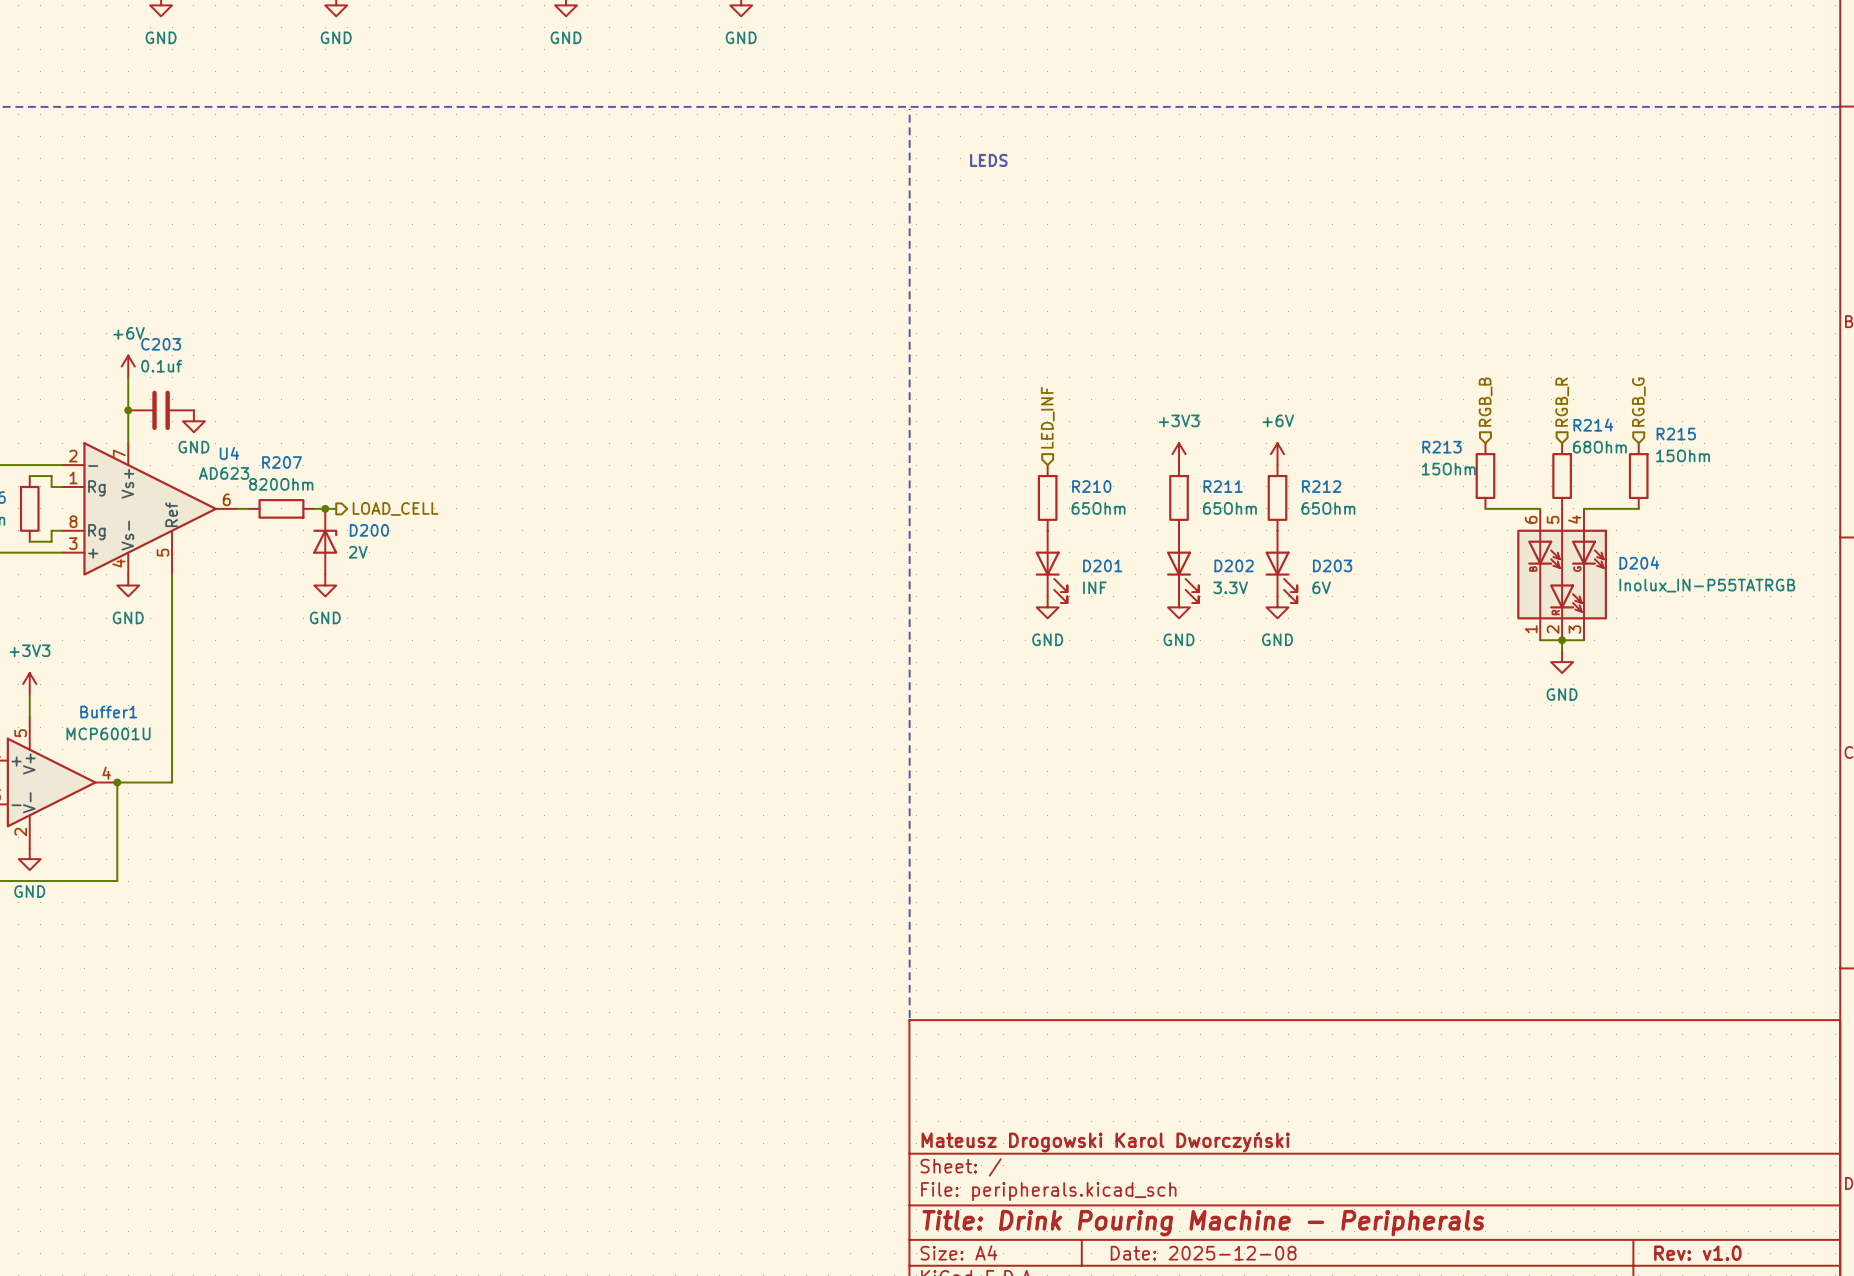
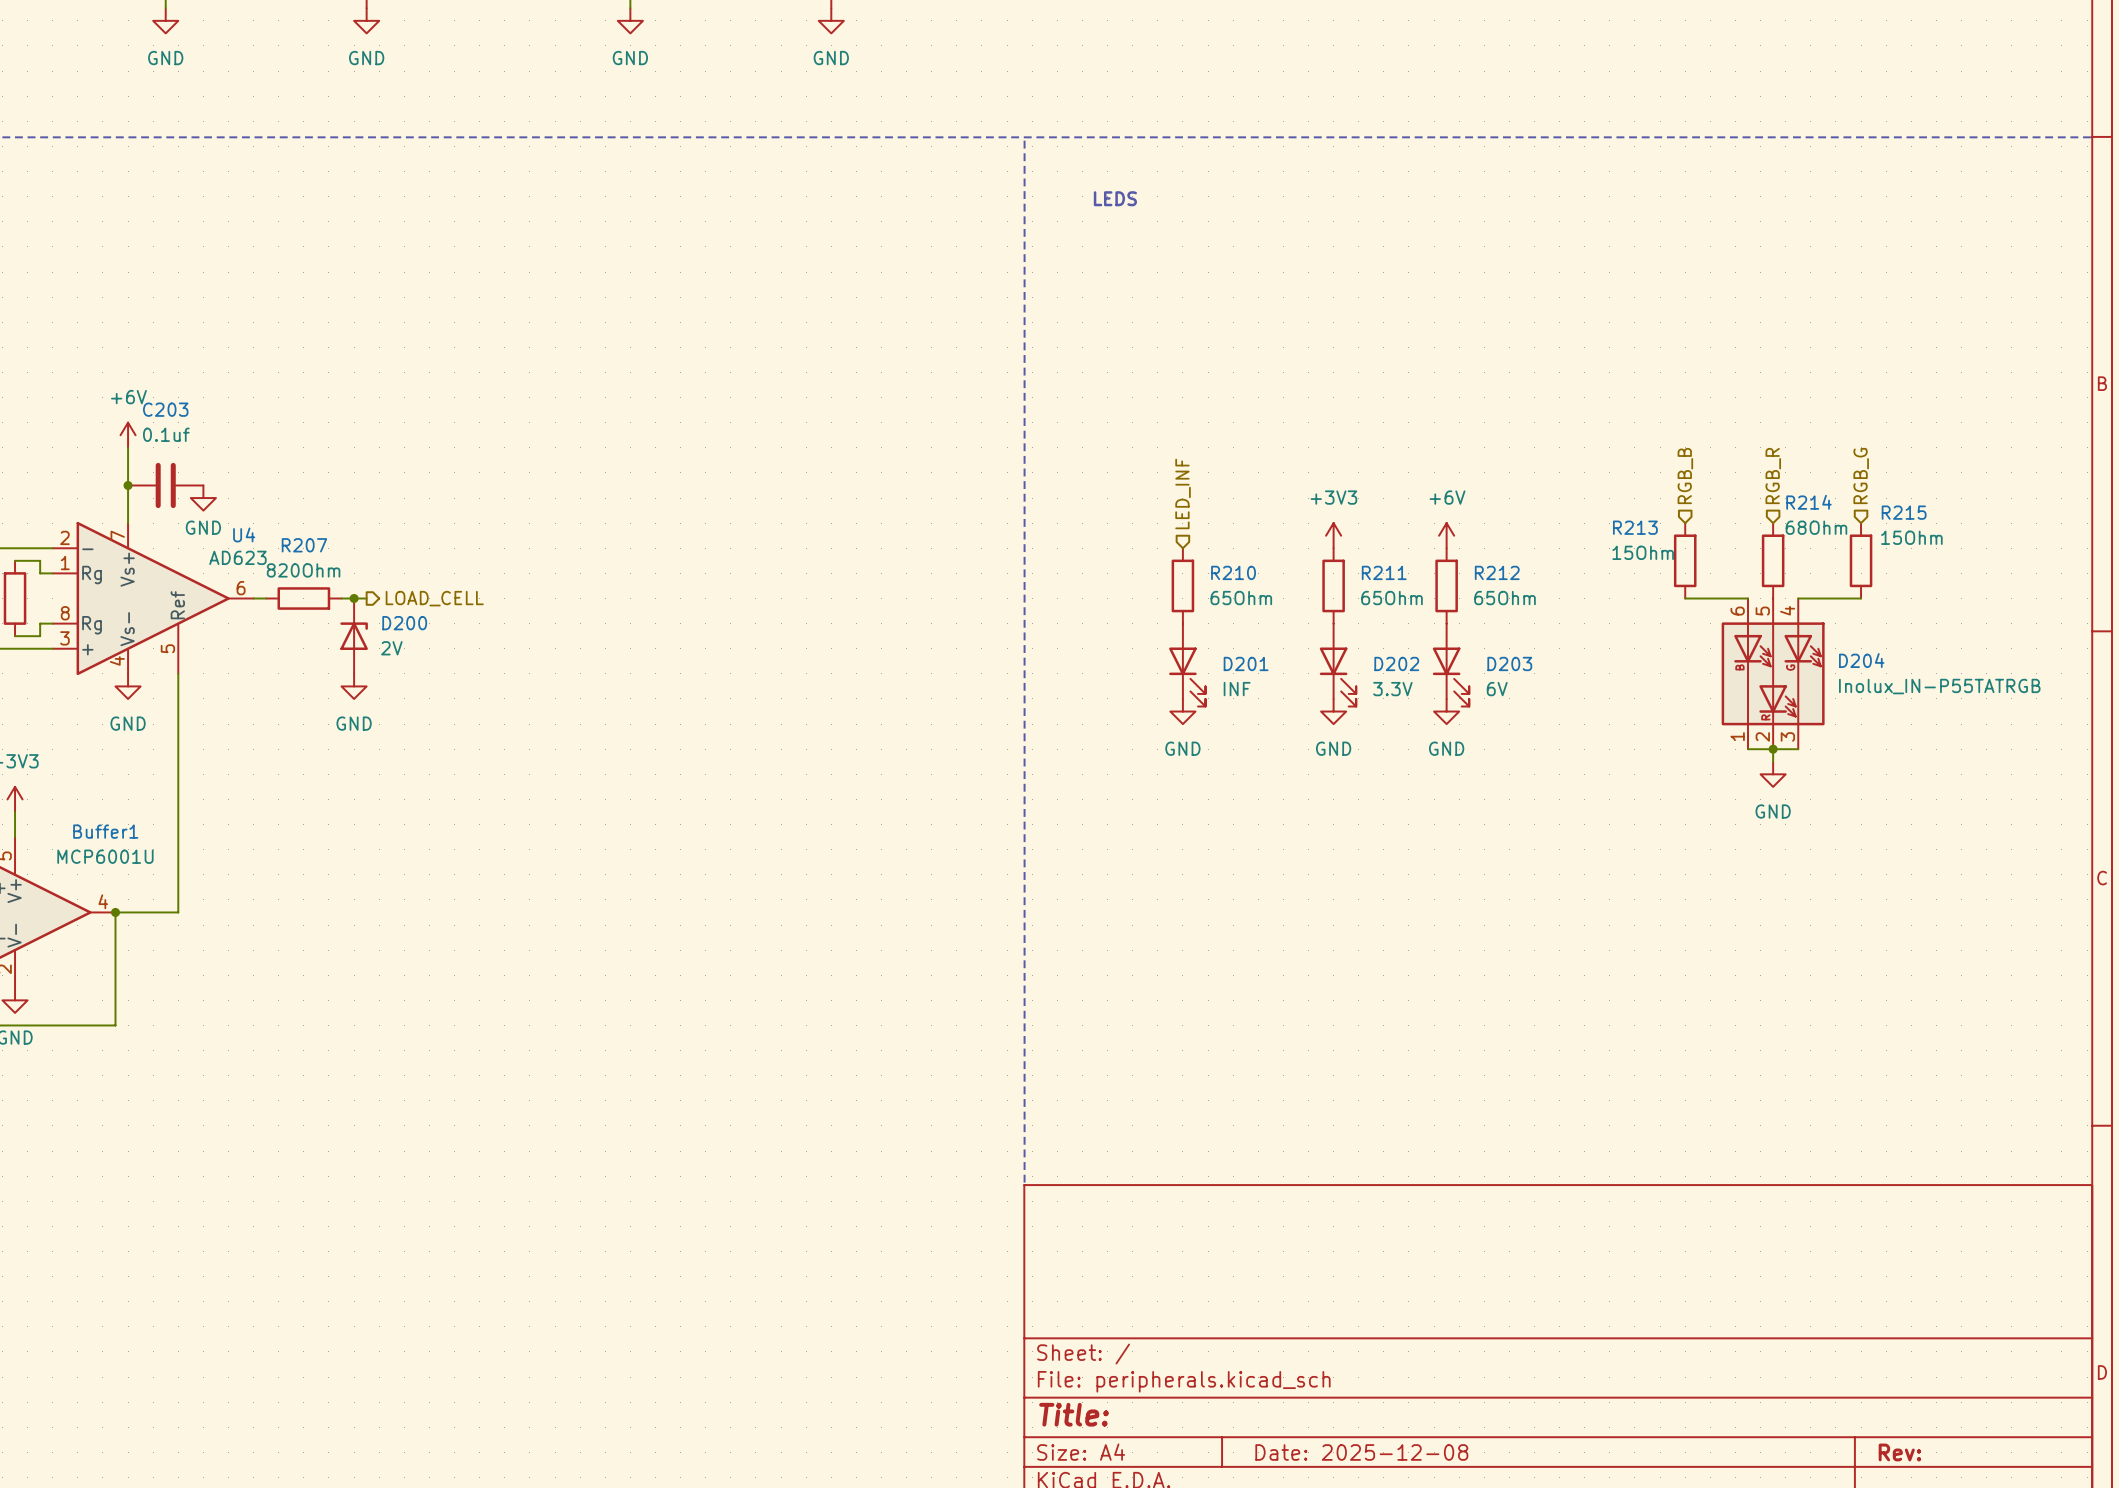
title block: Mateusz Drogowski Karol Dworczyński (1105, 1142) -> none
title block: Title: Drink Pouring Machine - Peripherals (1203, 1223) -> Title: (1074, 1414)
title block: Rev: v1.0 (1697, 1253) -> Rev: (1899, 1452)

